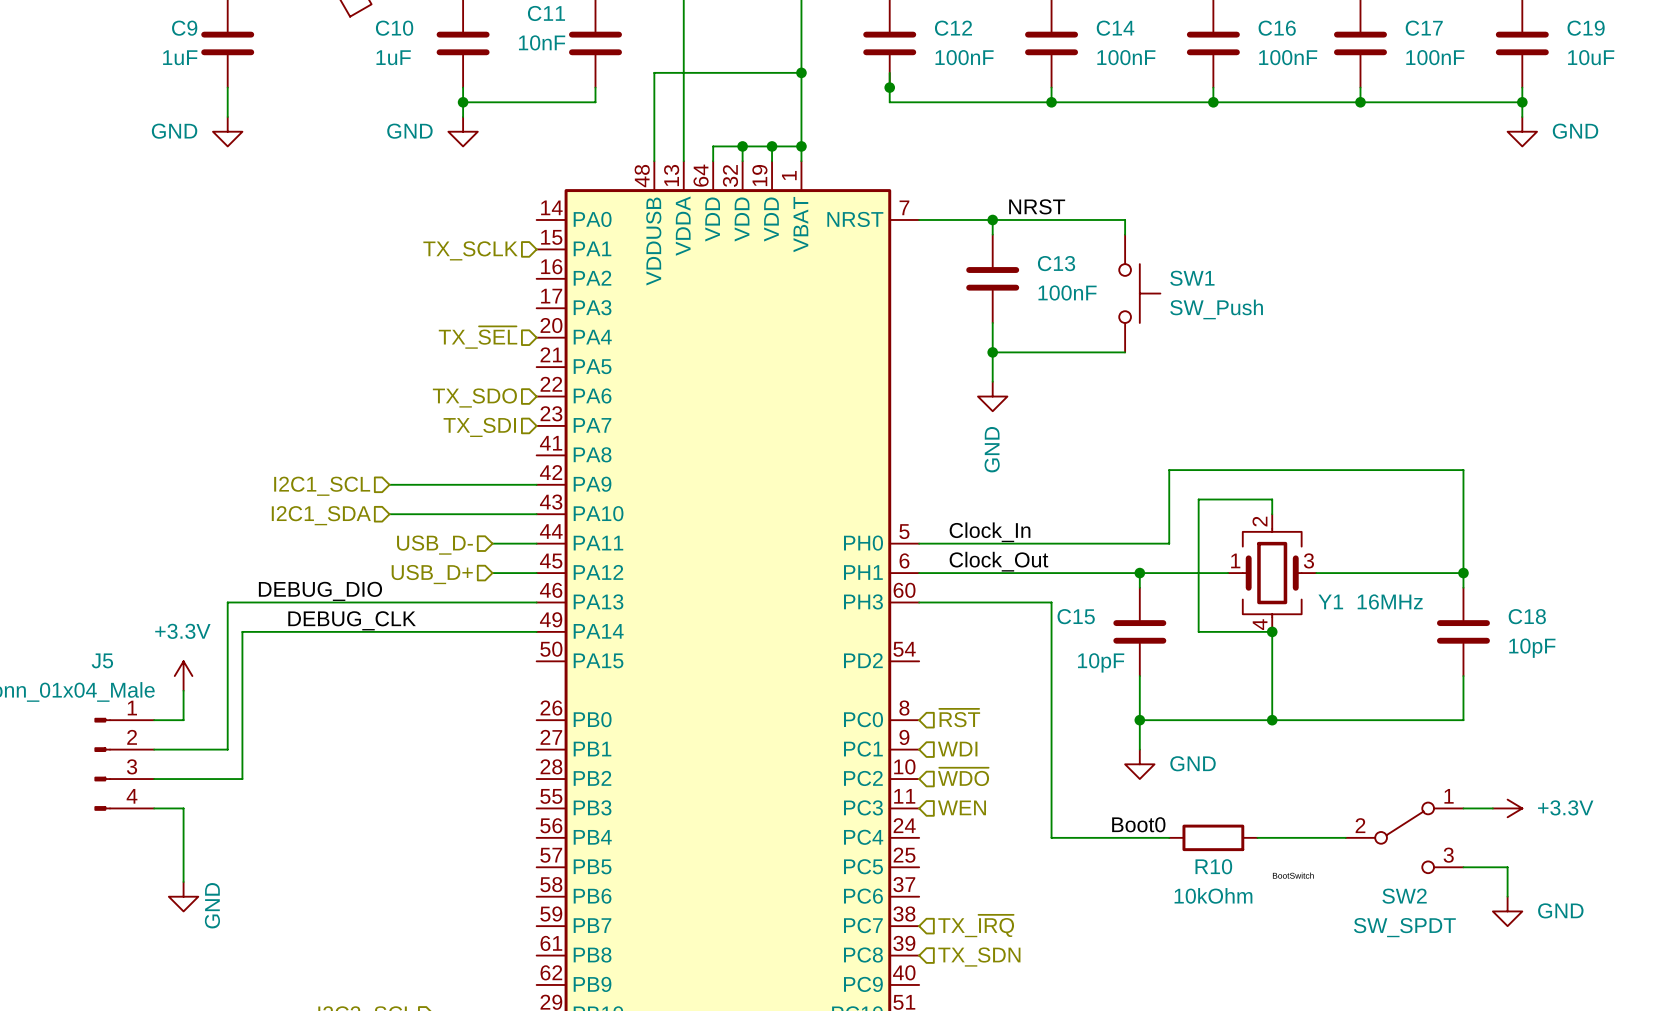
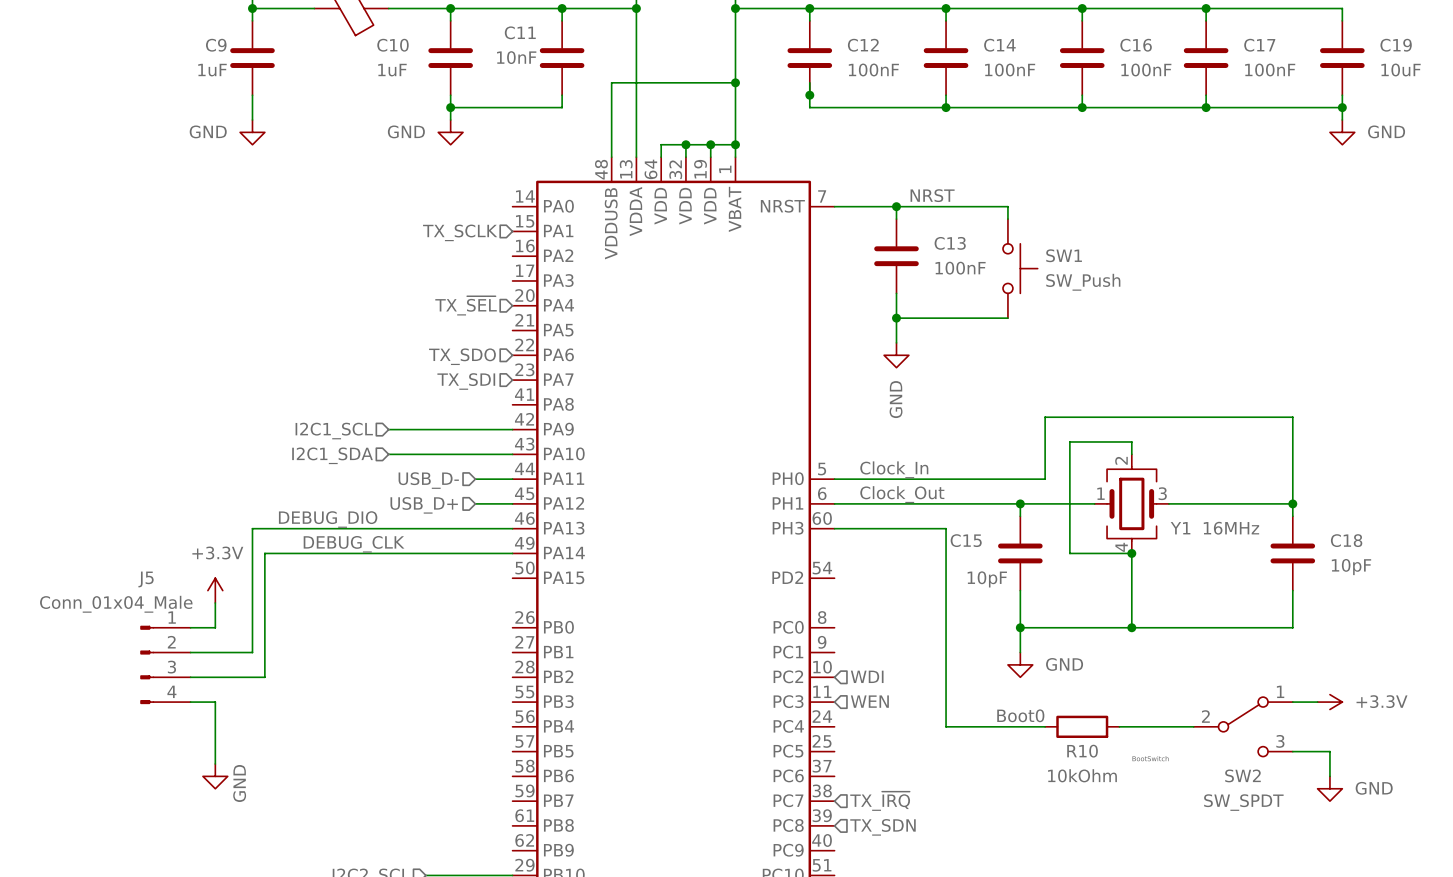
hierarchical label: ~{RST} (959, 718) -> none
hierarchical label: WDI (957, 749) -> none
hierarchical label: ~{WDO} (963, 776) -> WDI (867, 676)

